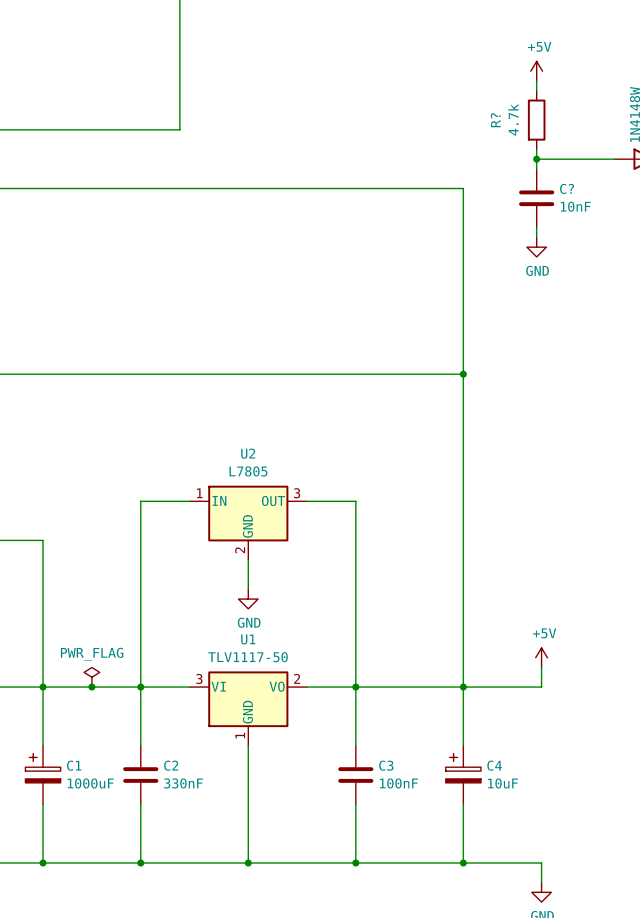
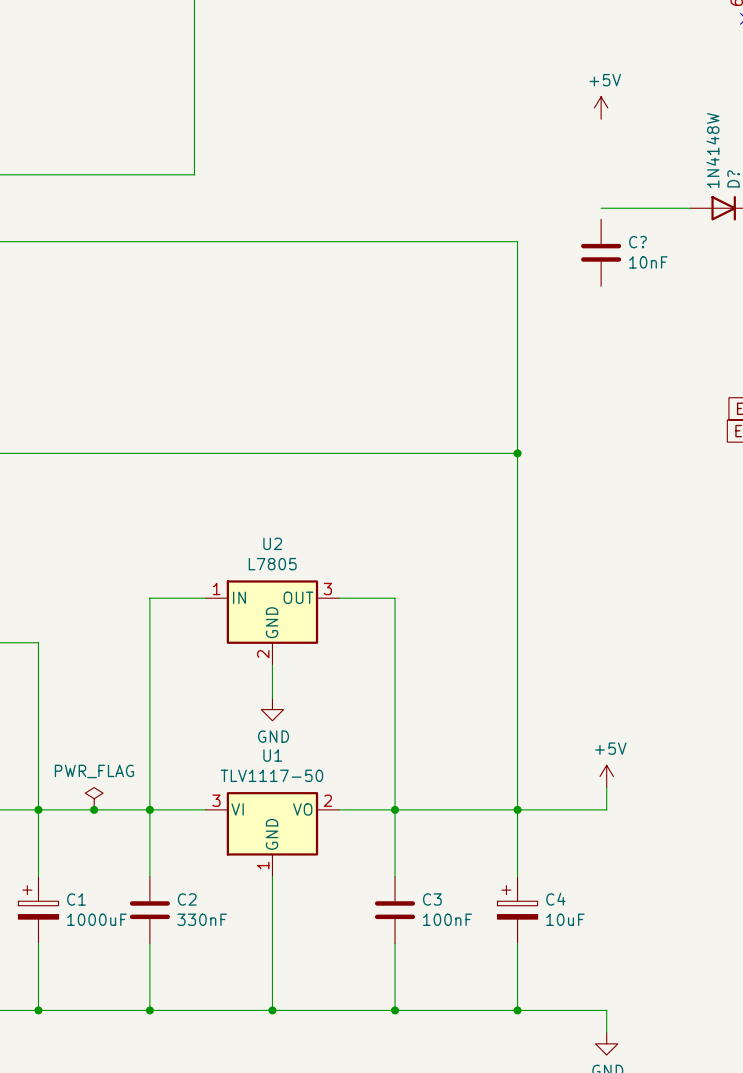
wire: (536, 80) (536, 90) -> none
R?: 4.7k (536, 120) -> none
wire: (536, 149) (536, 168) -> none
junction: (536, 159) -> none
wire: (536, 227) (536, 237) -> none
power symbol: GND (536, 247) -> none

